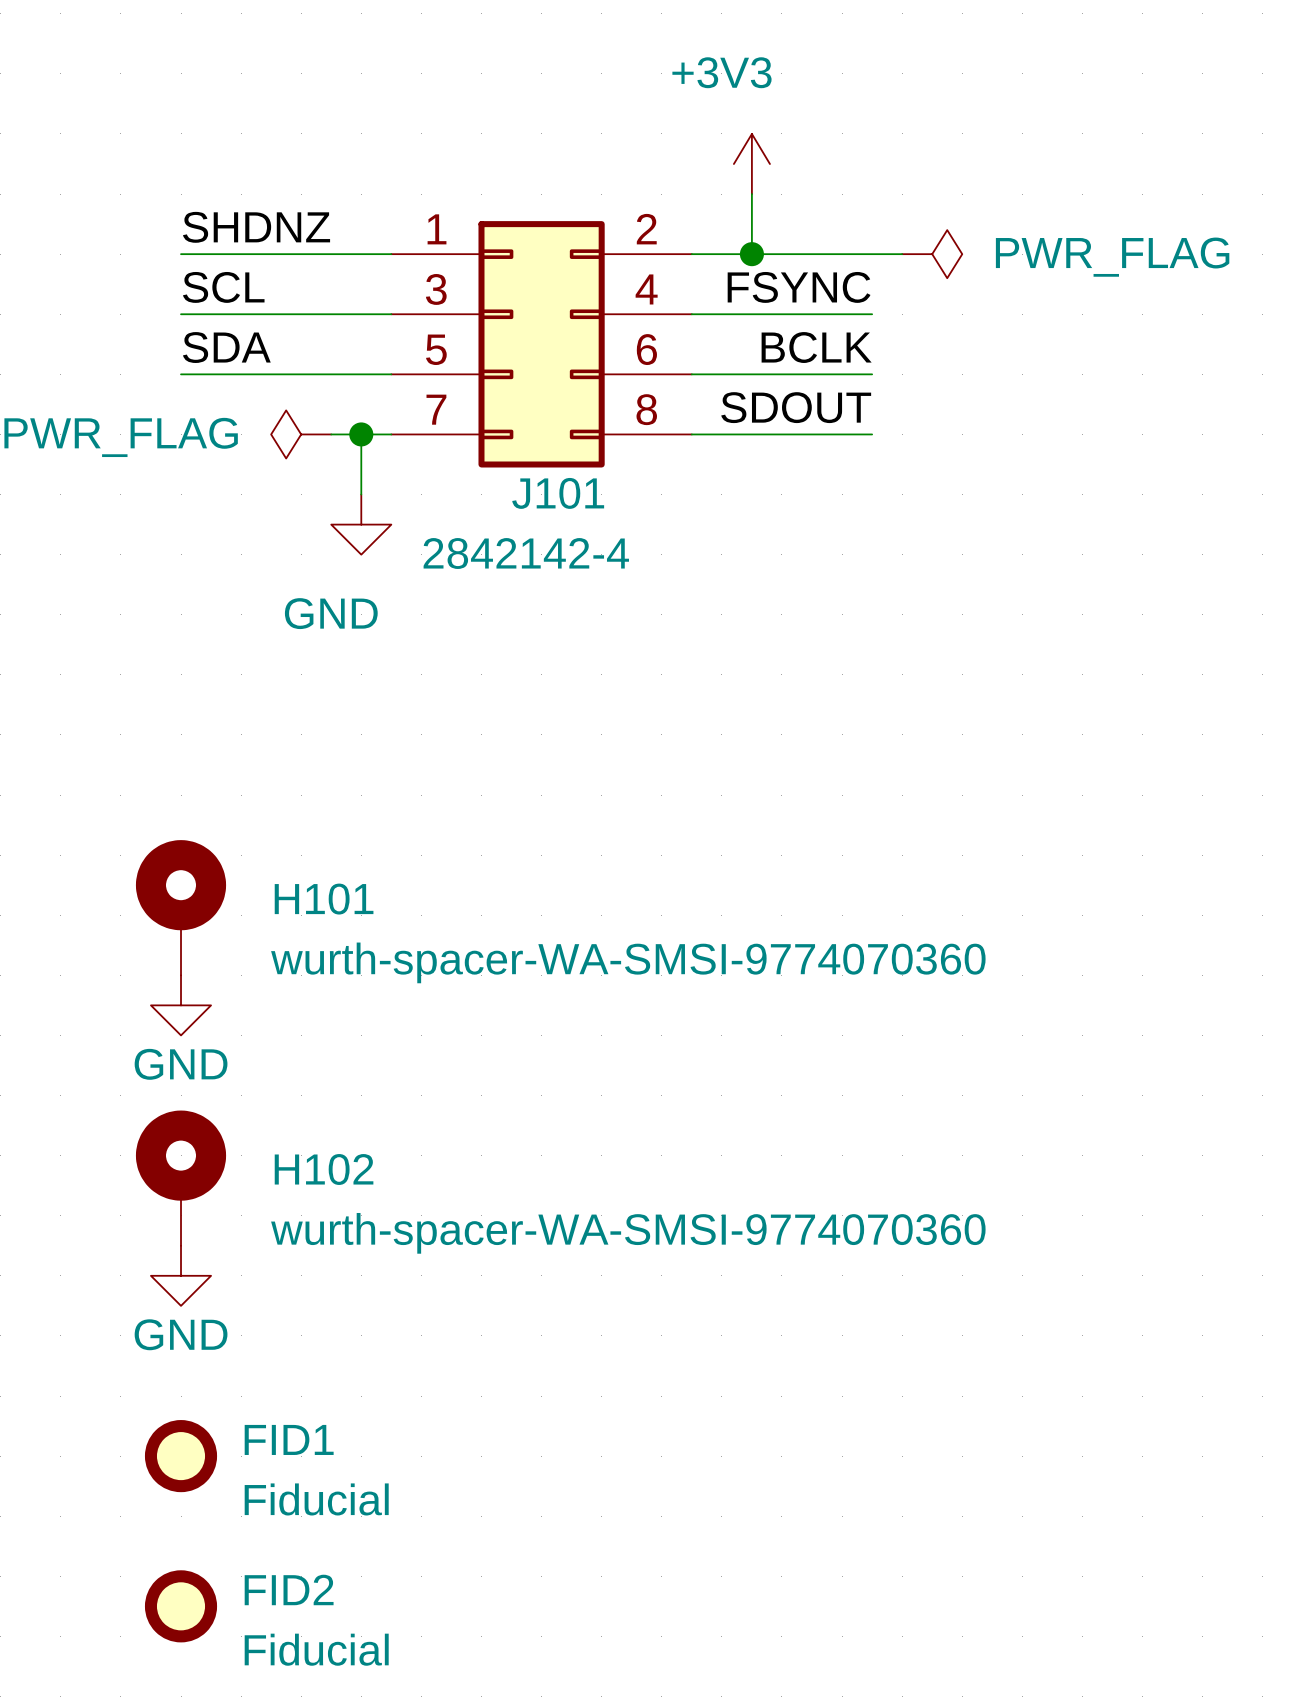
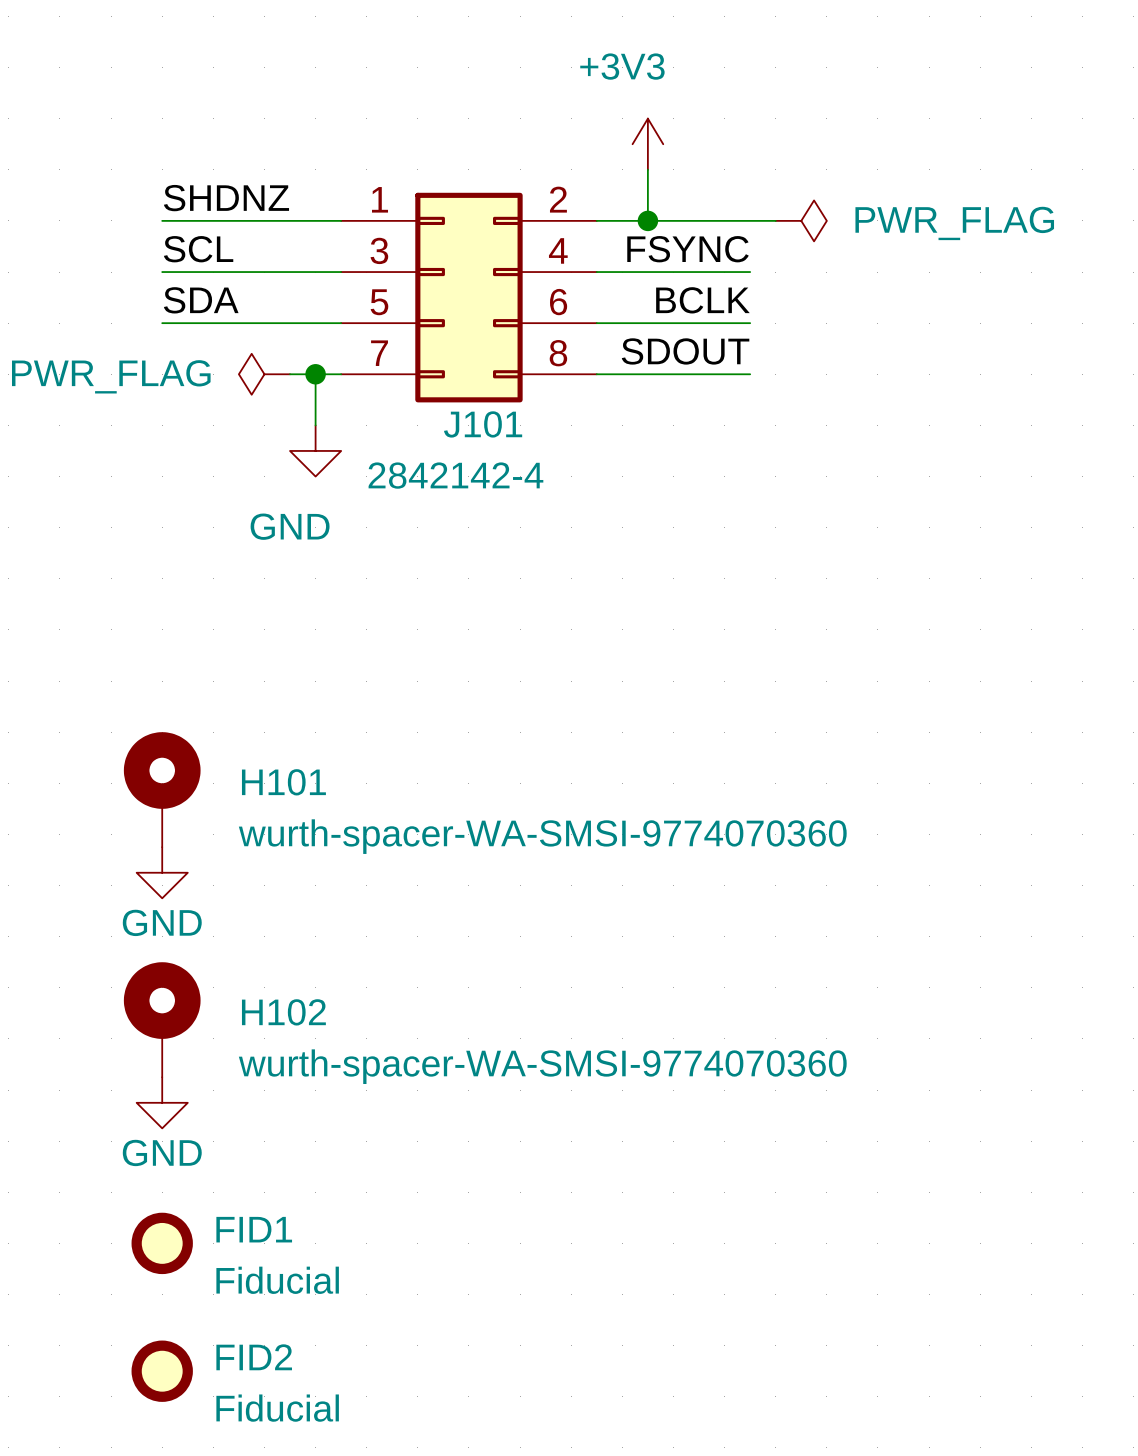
H101 position: (181, 907) -> (162, 789)
power symbol position: GND (181, 1005) -> GND (162, 872)
H102 position: (181, 1178) -> (162, 1019)
power symbol position: GND (181, 1275) -> GND (162, 1102)

